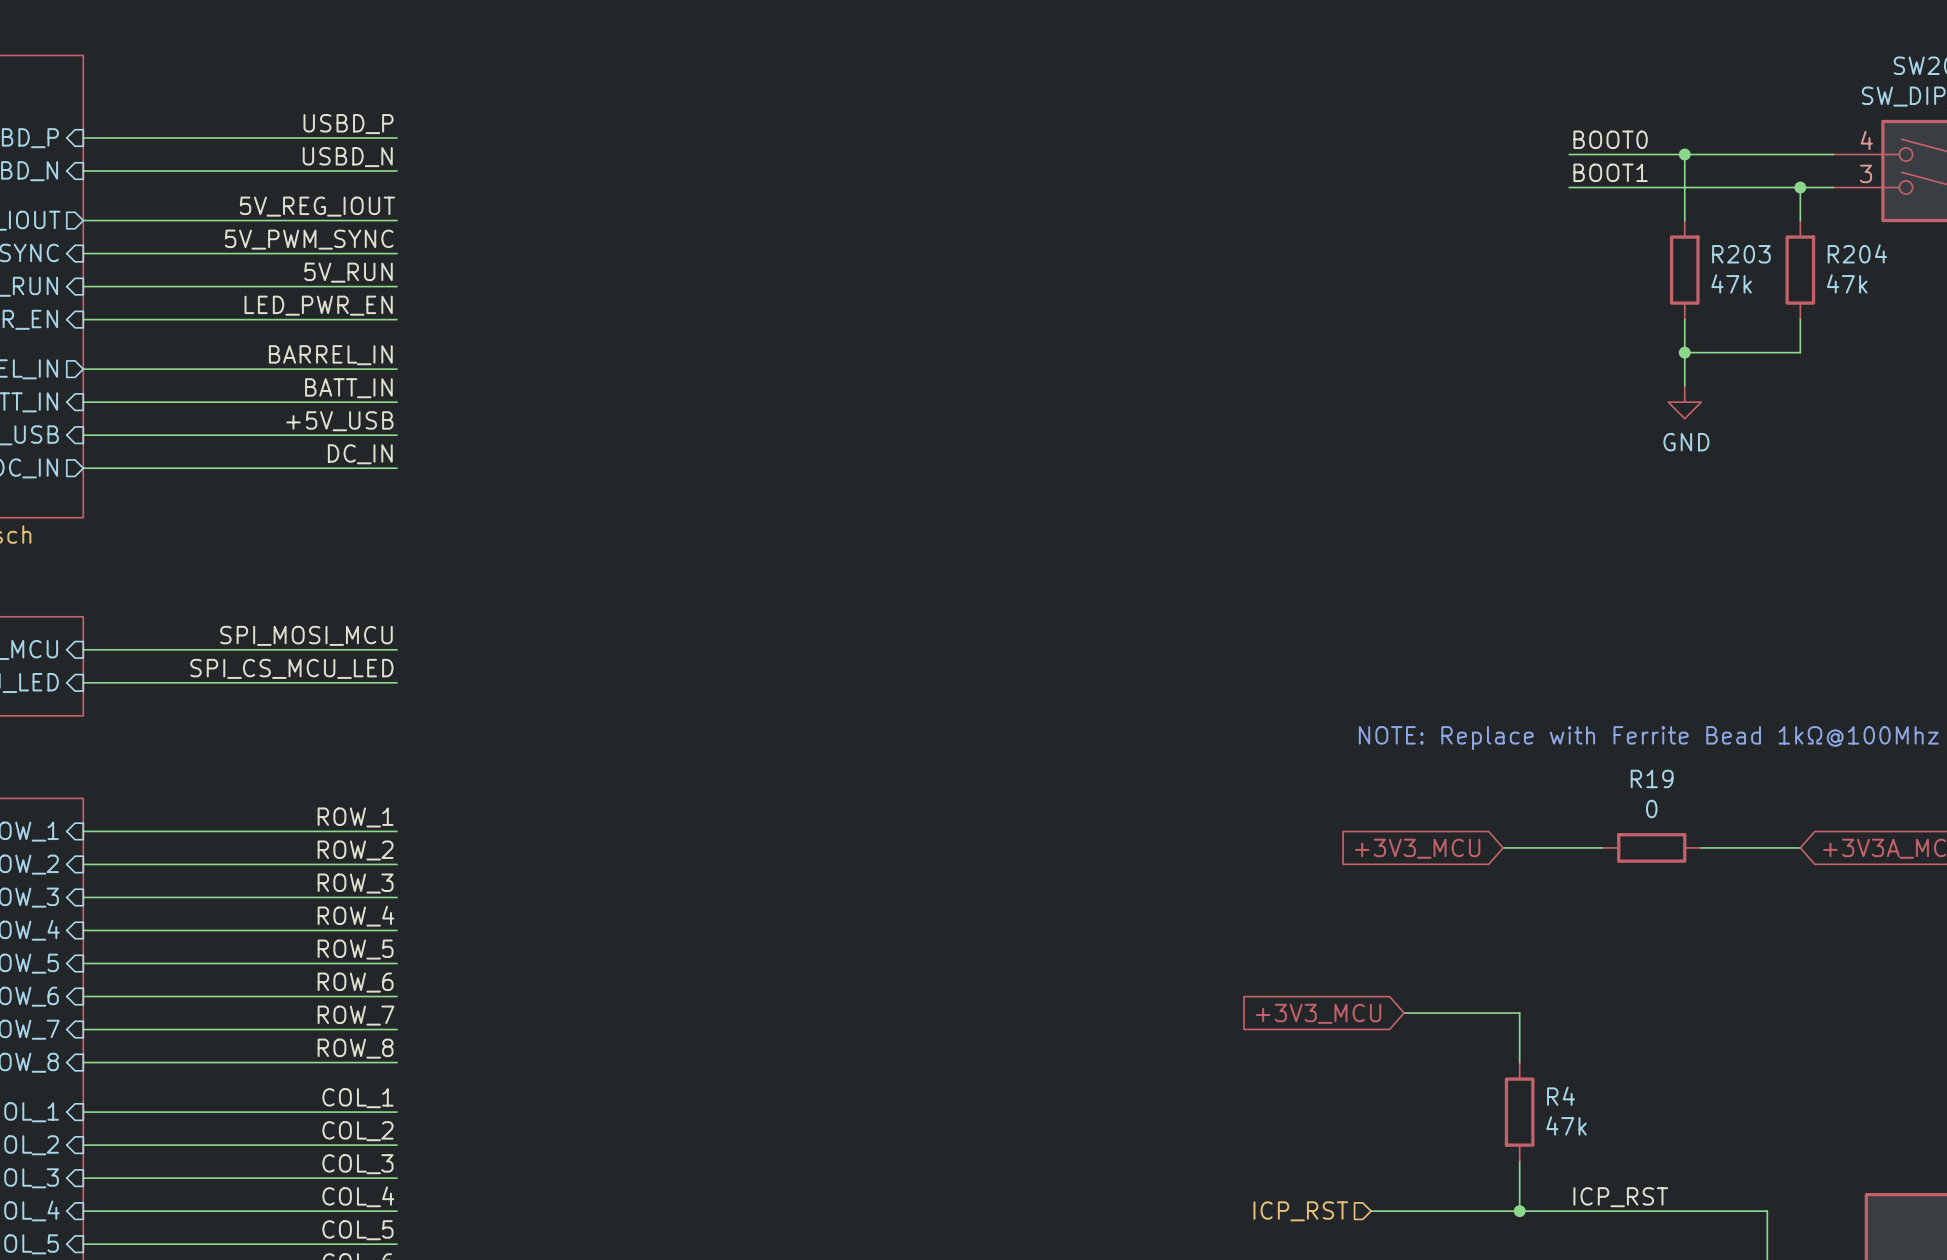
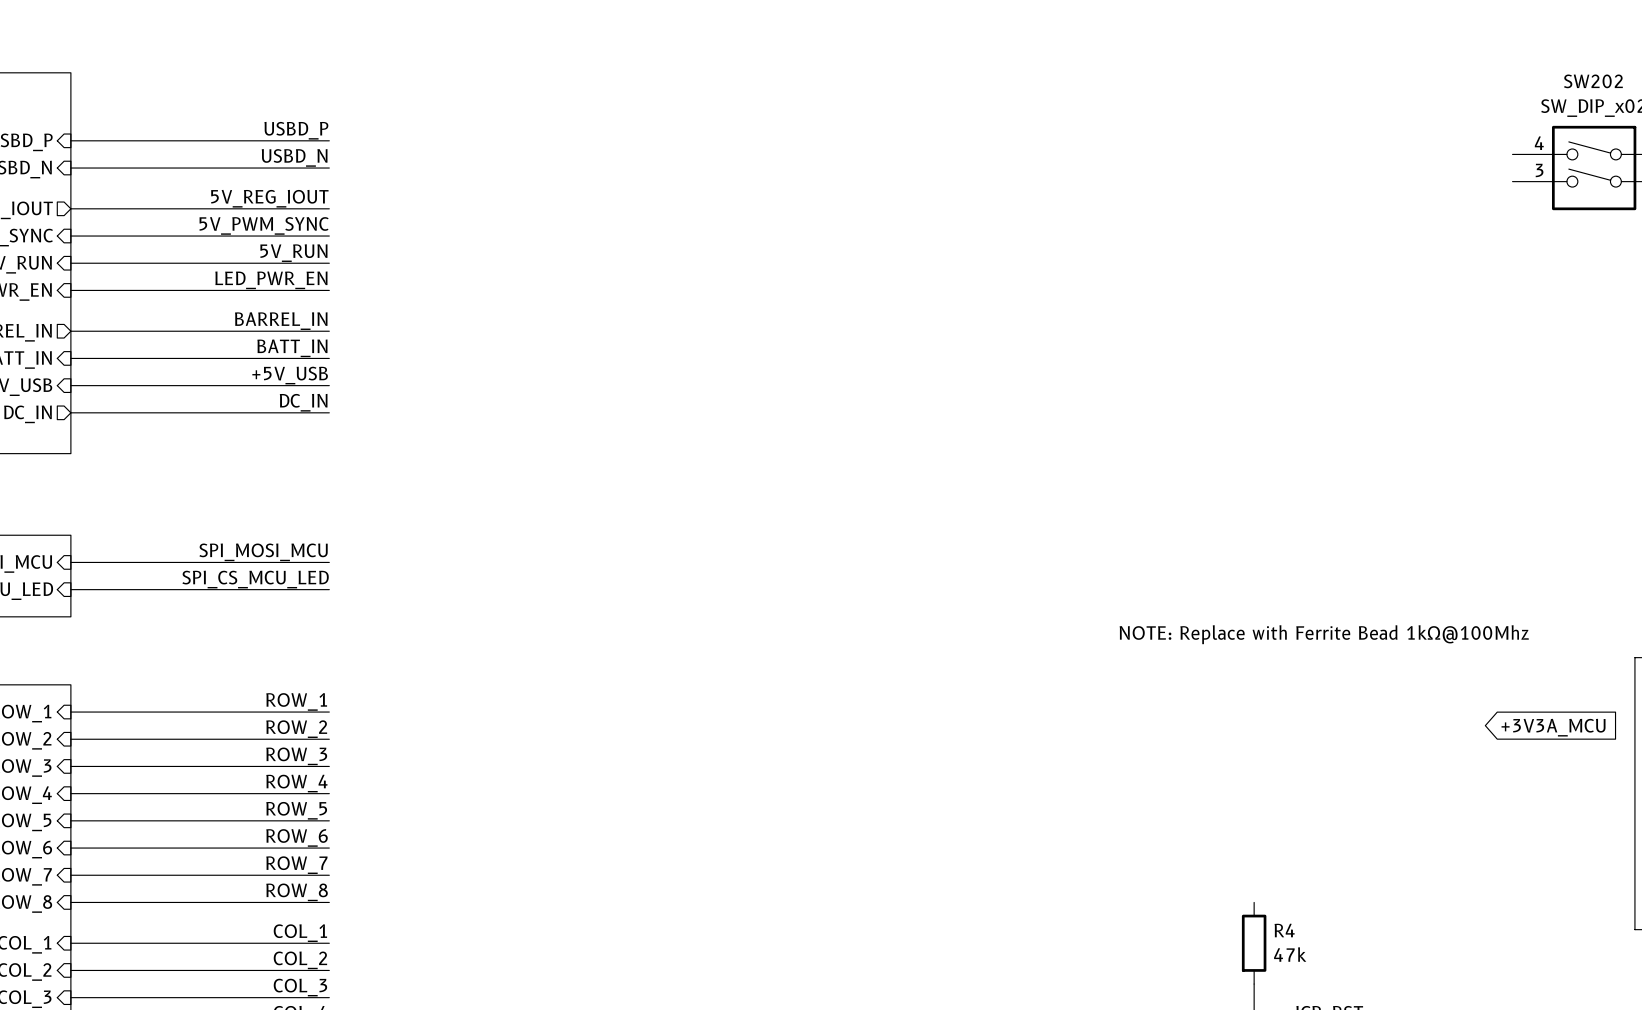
label: BOOT0 (1610, 139) -> none
wire: (1569, 154) (1833, 154) -> none
wire: (1684, 154) (1684, 220) -> none
junction: (1684, 154) -> none
label: BOOT1 (1610, 172) -> none
wire: (1569, 187) (1833, 187) -> none
wire: (1800, 187) (1800, 220) -> none
junction: (1800, 187) -> none
R203: 47k (1684, 270) -> none
R204: 47k (1800, 270) -> none
wire: (1684, 319) (1684, 385) -> none
wire: (1800, 319) (1800, 352) (1684, 352) -> none
junction: (1684, 352) -> none
power symbol: GND (1684, 402) -> none
wire: (1503, 847) (1602, 847) -> none
R19: 0 (1651, 847) -> none
wire: (1701, 847) (1800, 847) -> none
global label: +3V3_MCU (1417, 848) -> none
global label: +3V3_MCU (1318, 1013) -> none
wire: (1404, 1013) (1519, 1013) (1519, 1062) -> none

